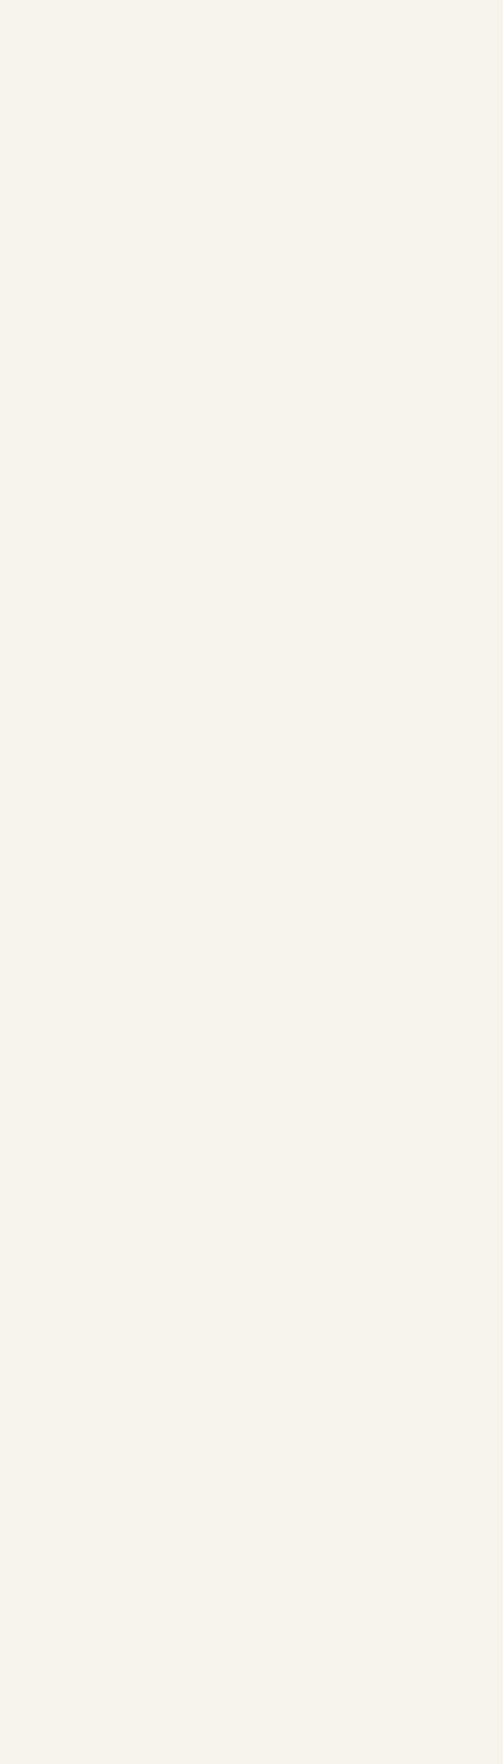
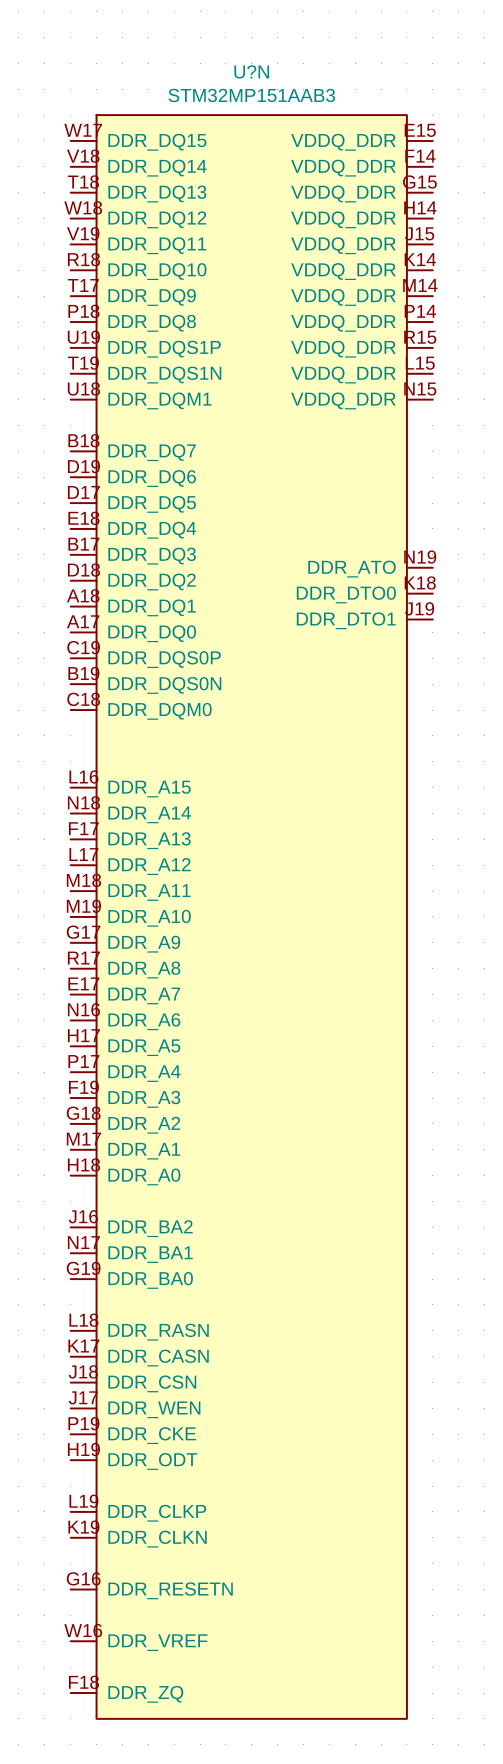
U?N: none -> STM32MP151AAB3 (251, 916)

